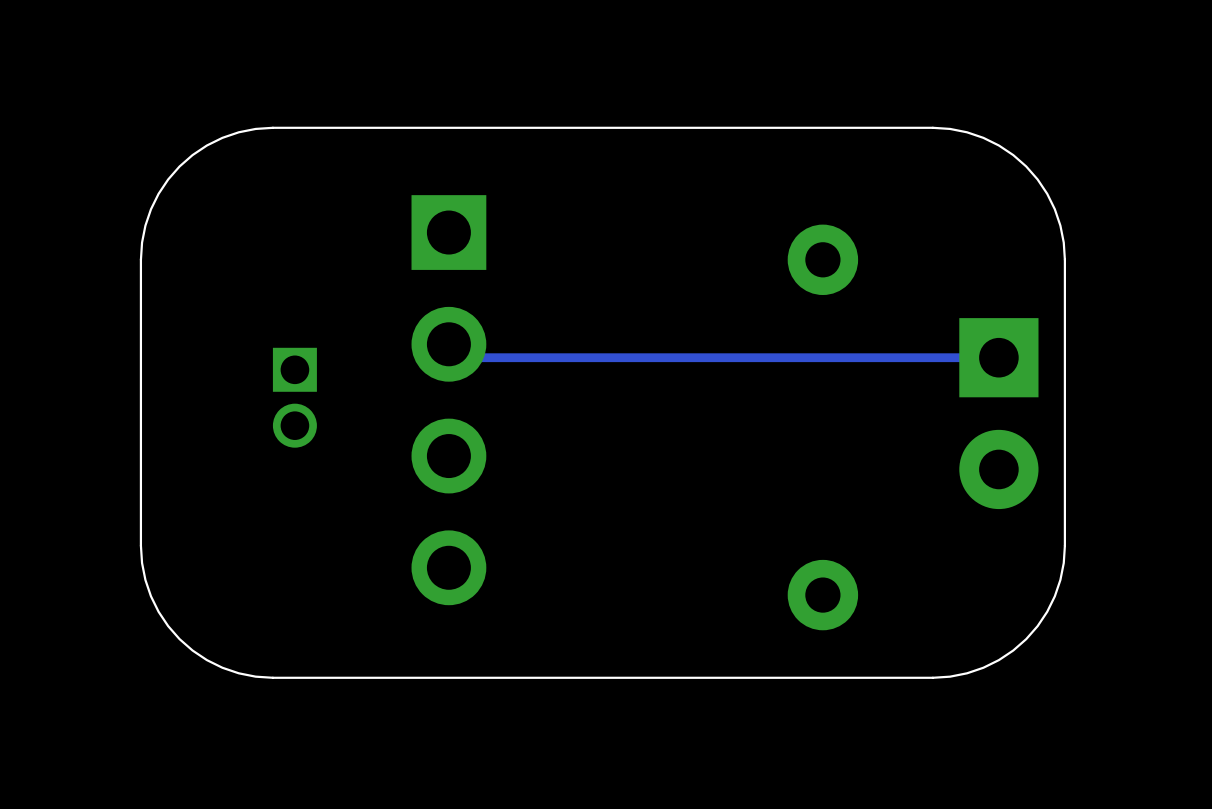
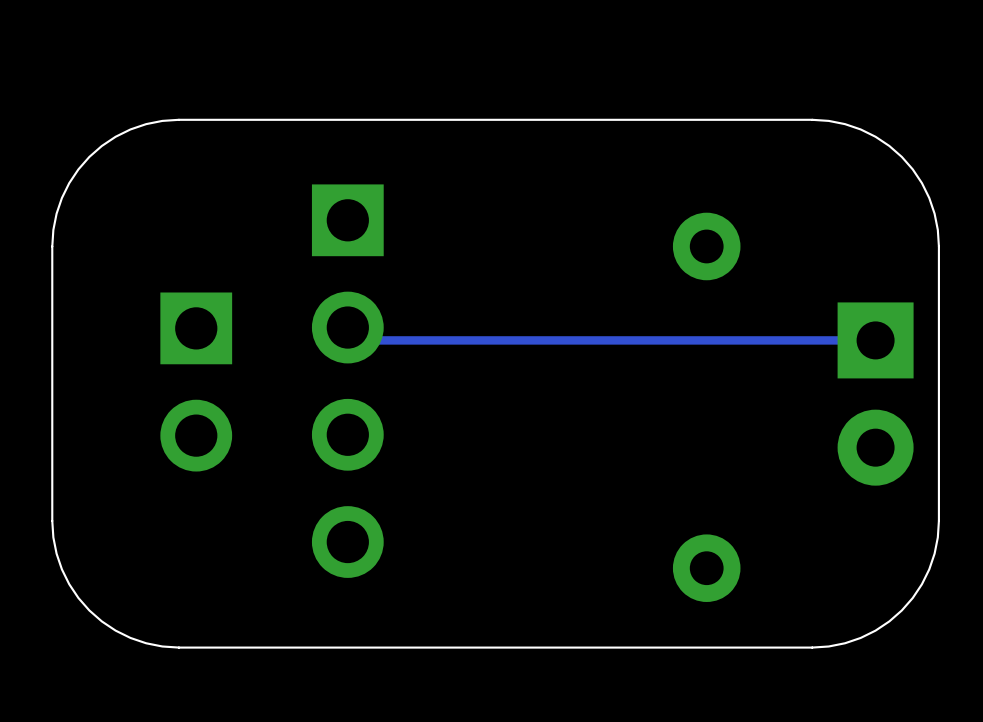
part footprint: [272, 347, 317, 448] -> [160, 292, 233, 472]

